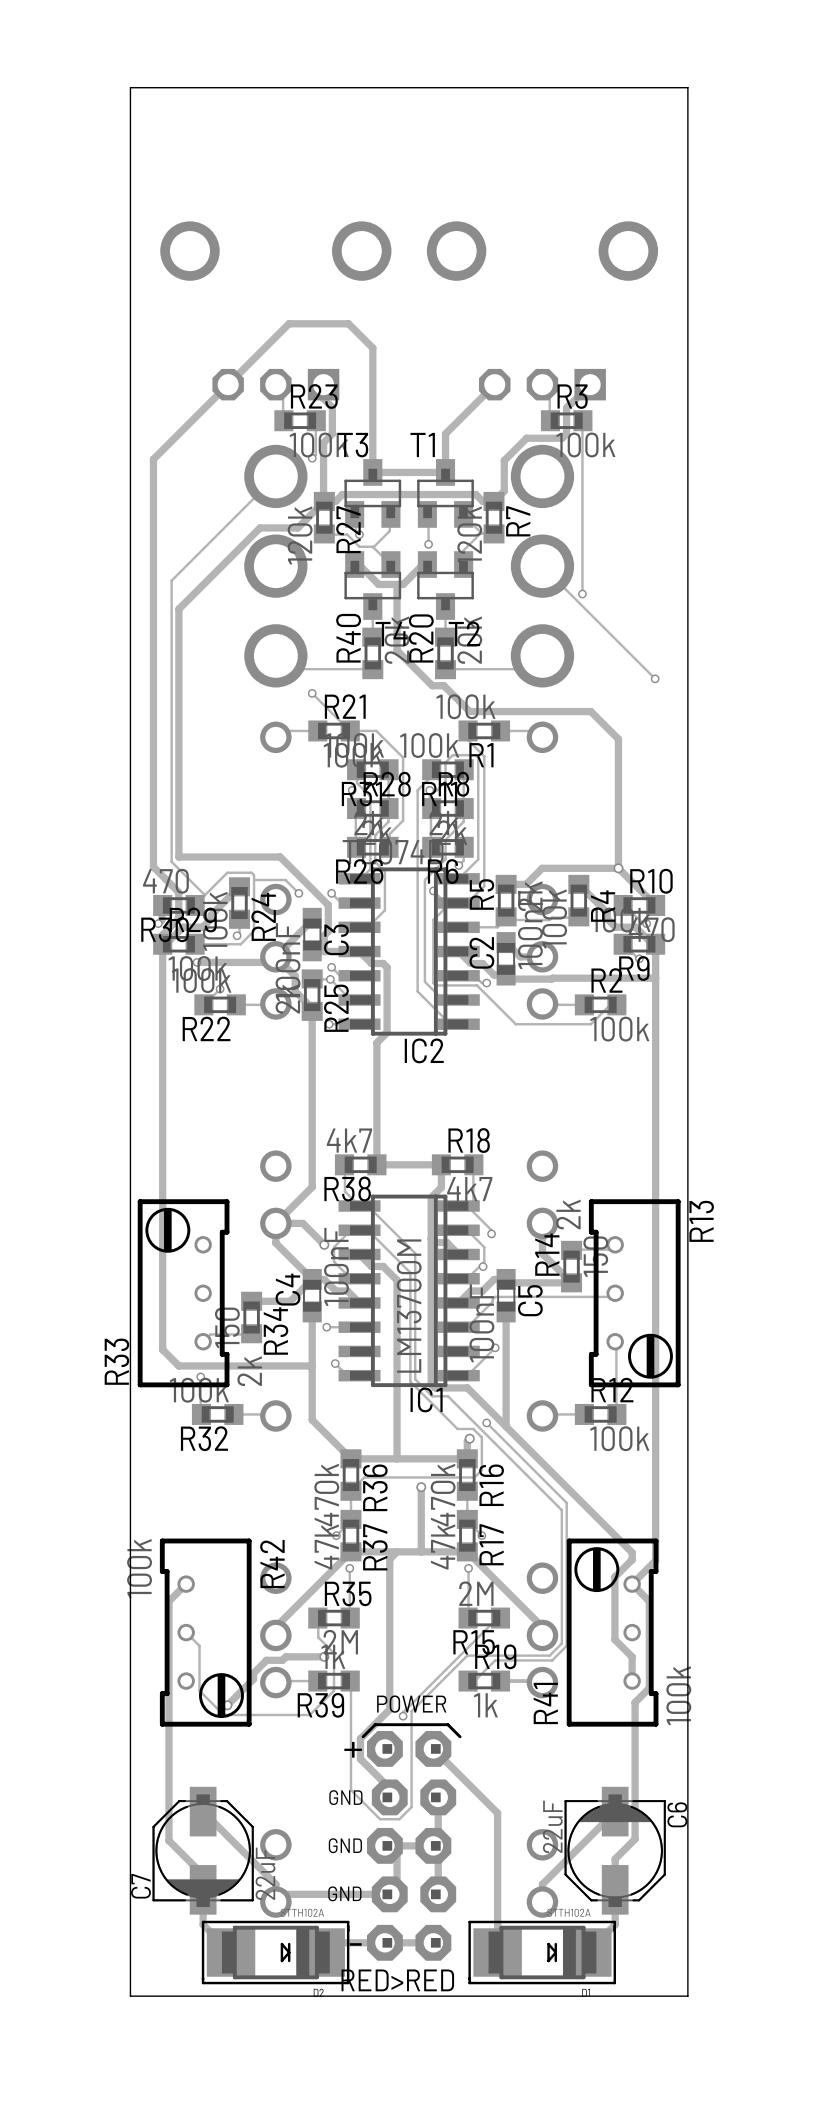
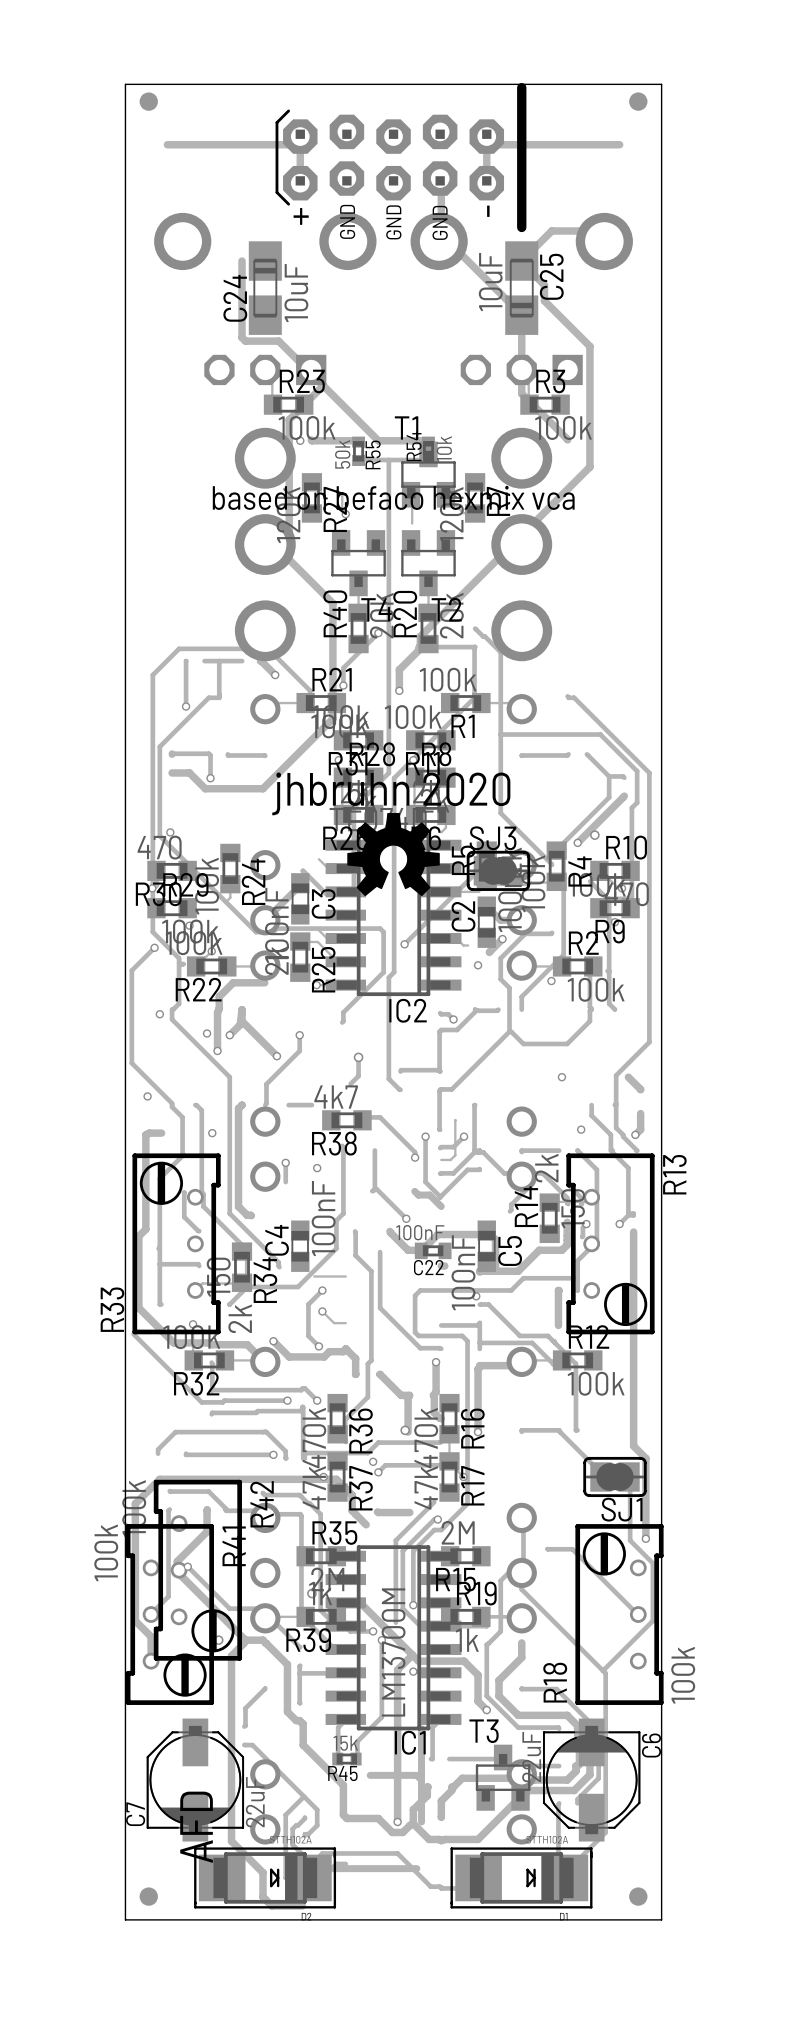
part: none -> (148, 101)
part: none -> (638, 101)
track: none -> (167, 144) (292, 144) (300, 136) (300, 183)
track: none -> (619, 144) (494, 144) (486, 136) (486, 183)
part: none -> (400, 157)
track: none -> (440, 178) (441, 234) (521, 315) (521, 393) (567, 439)
track: none -> (619, 230) (551, 230) (521, 261) (544, 285) (544, 300) (589, 346) (589, 467) (420, 636) (418, 650) (399, 669) (399, 690)
track: none -> (242, 261) (242, 337) (245, 341) (278, 341) (378, 440) (428, 442)
C24: none -> 10uF (265, 288)
C25: none -> 10uF (521, 288)
track: (323, 384) (323, 398) (332, 407) (332, 433) (323, 442) (324, 501) -> none
track: (494, 384) (445, 433) (445, 472) (372, 472) (372, 348) (348, 323) (289, 323) (153, 459) (153, 866) (178, 892) (178, 918) (162, 934) (162, 1349) (178, 1365) (312, 1365) -> none
track: (590, 384) (566, 407) (566, 433) (562, 438) (526, 438) (504, 460) (504, 491) (493, 501) (482, 501) (475, 494) (342, 494) (335, 501) (324, 501) -> none
track: none -> (323, 385) (289, 419) (289, 559) (332, 603) (332, 718) (262, 788) (205, 788) (189, 772) (172, 772)
track: (316, 420) (315, 454) (312, 458) -> none
track: (582, 420) (582, 594) -> none
track: none -> (311, 439) (358, 442)
R55: none -> 50k (358, 451)
R54: none -> 10k (428, 451)
track: (275, 476) (171, 580) (171, 861) (204, 895) -> none
track: none -> (388, 460) (388, 772) (353, 807) (353, 893) (325, 893) (302, 870)
track: none -> (428, 460) (358, 460)
T3 position: (372, 493) -> (503, 1777)
track: (324, 501) (297, 527) (260, 527) (178, 609) (178, 783) -> none
track: (390, 514) (389, 531) (373, 547) -> none
text: none -> based on befaco hexmix vca (393, 497)
track: (481, 532) (463, 550) (463, 564) -> none
track: (324, 533) (347, 534) (359, 546) (372, 546) (390, 564) -> none
via: (428, 544) -> none
track: (427, 564) (423, 564) (403, 584) (378, 584) (358, 564) (354, 564) -> none
track: (542, 566) (655, 678) -> none
track: (397, 584) (397, 650) (432, 685) (443, 685) (469, 711) (590, 711) (618, 739) (618, 868) -> none
via: (582, 594) -> none
track: none -> (475, 628) (500, 652) (500, 813) (552, 864)
track: (275, 655) (287, 669) (372, 669) -> none
track: (542, 655) (530, 669) (445, 669) -> none
track: none -> (378, 633) (343, 668) (343, 685)
via: none -> (378, 633)
track: none -> (437, 647) (475, 646) (475, 696) (394, 778) (394, 972) (388, 977) (388, 1078) (400, 1089)
via: (655, 678) -> none
track: none -> (186, 661) (186, 706)
track: none -> (219, 661) (219, 697) (208, 697) (159, 746) (159, 835) (255, 932) (273, 932) (276, 928) (380, 928) (383, 932) (383, 972) (343, 1012) (342, 1022)
track: none -> (242, 661) (204, 661)
track: none -> (260, 661) (275, 675)
track: (312, 693) (349, 730) (376, 730) (403, 757) (403, 820) (389, 833) (389, 847) -> none
via: (312, 693) -> none
via: none -> (275, 675)
via: none -> (343, 685)
via: none -> (399, 690)
track: none -> (311, 696) (310, 690) (268, 648) (179, 648) (152, 675) (152, 932) (179, 958) (179, 963) (183, 964) (179, 965) (179, 1003) (172, 1009) (172, 1019) (229, 1077) (229, 1213) (278, 1262) (279, 1267)
track: none -> (567, 696) (574, 697) (649, 772) (649, 1042) (616, 1075) (614, 1105) (616, 1127) (636, 1150)
track: (468, 730) (468, 740) (484, 756) (484, 886) (468, 901) (450, 903) (433, 920) (433, 983) (435, 985) (477, 985) (515, 1024) (590, 1024) (610, 1004) (616, 1004) -> none
via: none -> (186, 706)
track: none -> (500, 734) (600, 734) (637, 771) (637, 802) (631, 807) (631, 897) (630, 898) (607, 898) (590, 881)
track: (356, 769) (357, 783) (370, 796) (370, 869) (359, 878) -> none
track: (389, 769) (388, 821) (375, 835) (375, 861) (384, 871) (384, 910) (367, 927) (359, 927) -> none
track: (431, 769) (430, 777) (417, 790) (417, 991) (450, 1024) (458, 1024) -> none
track: (464, 769) (463, 821) (445, 840) (445, 859) (424, 880) (424, 981) (443, 1000) (458, 1000) -> none
track: (178, 784) (178, 857) (280, 857) (328, 905) (328, 931) (324, 935) (324, 951) -> (172, 754) (208, 753) (210, 755) (210, 778)
track: none -> (227, 754) (265, 755)
track: none -> (568, 754) (521, 755)
track: none -> (586, 754) (609, 776)
track: none -> (609, 776) (624, 777)
track: none -> (609, 776) (609, 797) (563, 842) (563, 954) (521, 996) (521, 1009)
track: (431, 808) (429, 807) (429, 790) (437, 790) (445, 781) (445, 762) (452, 755) (475, 755) (478, 757) (478, 859) (458, 878) -> none
via: none -> (210, 778)
text: none -> jhbruhn 2020 (391, 793)
track: none -> (624, 796) (577, 842)
drawing: none -> [347, 812, 440, 897]
via: none -> (170, 832)
via: (458, 865) -> none
track: (618, 868) (542, 868) (526, 884) (506, 884) -> none
track: (618, 868) (655, 905) -> none
via: none -> (577, 842)
track: (254, 880) (285, 880) (298, 893) -> none
track: (578, 884) (607, 912) (607, 918) (615, 927) (635, 927) (652, 944) (655, 944) (655, 1560) (632, 1584) (649, 1601) (649, 1688) (635, 1702) (635, 1839) (615, 1859) (615, 1924) (587, 1952) -> none
track: (239, 886) (211, 915) (211, 918) (202, 927) (182, 927) (162, 947) -> none
via: (298, 893) -> none
via: (331, 893) -> none
track: (195, 905) (227, 872) (251, 872) (254, 875) (254, 930) (240, 944) (195, 944) -> none
track: none -> (484, 870) (478, 870) (404, 944)
SJ3: none -> (498, 870)
track: none -> (609, 898) (609, 1003) (614, 1009)
via: (237, 935) -> none
track: (312, 950) (359, 951) (371, 963) (383, 963) (387, 967) (387, 1032) (376, 1042) (376, 1164) (441, 1164) (441, 1187) (431, 1197) (431, 1384) (435, 1387) (467, 1387) (632, 1552) (632, 1559) (614, 1576) (614, 1639) (632, 1656) (632, 1681) -> none
track: (458, 951) (470, 963) (482, 963) (494, 975) (506, 975) (510, 979) (655, 978) -> none
track: (197, 962) (269, 962) (275, 956) (295, 976) (295, 991) (312, 1008) (312, 1187) (275, 1223) -> none
via: (331, 967) -> none
track: none -> (552, 932) (525, 933) (500, 958) (500, 979) (509, 988) (509, 1031)
track: none -> (502, 939) (489, 952)
via: none -> (502, 939)
via: (330, 979) -> none
via: none -> (404, 944)
via: (486, 983) -> none
track: none -> (154, 947) (131, 970) (131, 1063) (172, 1103) (172, 1106) (182, 1117) (183, 1155) (159, 1178) (158, 1248) (159, 1304) (161, 1304)
via: none -> (154, 947)
via: none -> (478, 965)
track: none -> (589, 971) (589, 1007) (591, 1009) (589, 1021) (567, 1043) (523, 1043) (509, 1031)
via: none -> (551, 981)
track: none -> (264, 982) (233, 982) (219, 996) (217, 1050)
track: none -> (498, 1009) (475, 1009) (476, 1010) (457, 1029) (441, 1029) (439, 1031) (440, 1071) (400, 1071)
track: none -> (440, 1013) (448, 1014) (453, 1019)
via: none -> (159, 1014)
via: none -> (453, 1019)
track: none -> (509, 1031) (451, 1089) (440, 1089) (440, 1129)
via: none -> (207, 1033)
track: none -> (229, 1035) (240, 1024) (242, 1009) (242, 1021) (276, 1056)
via: none -> (229, 1035)
track: none -> (299, 1035) (299, 1050) (266, 1084) (265, 1105)
via: none -> (299, 1035)
via: none -> (217, 1050)
via: none -> (276, 1056)
track: none -> (358, 1057) (358, 1076) (350, 1084)
via: none -> (358, 1057)
via: none -> (561, 1077)
track: none -> (628, 1077) (640, 1089)
via: none -> (147, 1096)
R18 name position: R18 (469, 1140) -> R18 (555, 1682)
track: none -> (195, 1105) (201, 1110) (203, 1206) (247, 1250) (247, 1287)
track: none -> (311, 1105) (288, 1105)
track: none -> (475, 1105) (474, 1150) (479, 1150)
track: none -> (591, 1105) (591, 1115) (610, 1134) (610, 1150) (628, 1168) (628, 1213) (633, 1213) (633, 1215) (628, 1215) (619, 1224)
track: none -> (242, 1105) (238, 1108) (238, 1206) (247, 1215) (251, 1215)
R18 footprint: [431, 1154, 484, 1176] -> [575, 1524, 664, 1705]
track: none -> (640, 1113) (640, 1129) (635, 1134)
track: none -> (369, 1117) (380, 1117) (415, 1152) (415, 1157)
track: (344, 1164) (344, 1191) (359, 1206) (367, 1206) (415, 1253) (415, 1379) (432, 1396) (447, 1396) (561, 1510) (561, 1643) (549, 1655) (467, 1655) (411, 1711) (411, 1807) (399, 1819) (380, 1819) (350, 1790) (350, 1681) -> none
via: none -> (581, 1129)
track: none -> (161, 1133) (145, 1134) (145, 1229) (138, 1236) (138, 1307) (173, 1342) (247, 1344) (265, 1363)
via: none -> (212, 1133)
via: none -> (635, 1134)
track: none -> (425, 1136) (425, 1182) (440, 1197) (467, 1169) (479, 1169)
via: none -> (425, 1136)
track: none -> (464, 1136) (453, 1147) (440, 1148)
via: none -> (464, 1136)
R18 value: 4k7 (469, 1189) -> 100k (683, 1675)
track: none -> (342, 1145) (343, 1213) (336, 1220) (336, 1248) (297, 1287) (247, 1287)
track: none -> (374, 1150) (374, 1189) (372, 1191) (376, 1189) (406, 1218)
track: none -> (479, 1150) (504, 1173) (542, 1173) (567, 1197) (568, 1204)
track: none -> (479, 1150) (474, 1152) (453, 1173) (440, 1173)
track: none -> (559, 1150) (521, 1152)
track: none -> (577, 1150) (596, 1169) (596, 1241) (577, 1260) (577, 1290)
via: none -> (415, 1157)
track: (467, 1206) (491, 1230) (491, 1233) -> none
track: none -> (285, 1162) (285, 1182)
via: none -> (285, 1162)
via: none -> (317, 1168)
track: (275, 1223) (275, 1243) (312, 1279) -> none
track: (275, 1223) (302, 1223) (324, 1244) -> none
track: (542, 1223) (542, 1253) (571, 1282) (509, 1282) (506, 1279) (494, 1279) (482, 1290) (470, 1290) (458, 1302) -> none
track: (458, 1230) (467, 1230) (484, 1247) (484, 1261) (467, 1278) (458, 1278) -> none
track: none -> (530, 1185) (511, 1204) (510, 1211)
via: (491, 1233) -> none
track: none -> (570, 1187) (581, 1197) (582, 1204)
track: none -> (183, 1192) (184, 1217) (199, 1231)
via: (324, 1244) -> none
track: (359, 1254) (371, 1266) (383, 1266) (397, 1280) (397, 1458) -> none
via: (483, 1266) -> none
via: none -> (406, 1218)
track: none -> (567, 1222) (567, 1245) (561, 1250) (539, 1250) (518, 1271) (479, 1272)
track: none -> (586, 1224) (582, 1227) (582, 1237)
via: none -> (586, 1224)
via: none -> (619, 1224)
track: (359, 1278) (350, 1278) (334, 1261) (334, 1247) (350, 1230) (367, 1230) (410, 1272) (410, 1381) (457, 1428) (473, 1428) (481, 1437) (481, 1470) (474, 1477) (364, 1477) (350, 1490) (350, 1521) (336, 1535) -> none
track: (312, 1279) (324, 1279) (335, 1290) (347, 1290) (359, 1302) -> none
track: (312, 1279) (290, 1301) (251, 1301) -> none
track: none -> (355, 1231) (355, 1255) (371, 1271) (371, 1360) (367, 1363) (367, 1397) (345, 1419) (345, 1442)
track: none -> (389, 1231) (408, 1250) (421, 1250) (437, 1234) (490, 1234) (495, 1239) (495, 1271)
track: none -> (633, 1232) (633, 1446) (645, 1458) (645, 1538)
IC1 position: (409, 1290) -> (393, 1637)
track: (615, 1293) (611, 1296) (495, 1296) (467, 1327) (458, 1327) -> none
C22: none -> 100nF (433, 1250)
track: none -> (380, 1252) (380, 1307) (420, 1348) (441, 1348)
track: (312, 1311) (312, 1420) (350, 1458) (467, 1458) (467, 1441) (469, 1438) -> none
track: (506, 1311) (506, 1426) -> none
track: none -> (159, 1264) (198, 1264) (199, 1265)
track: none -> (444, 1266) (441, 1266)
via position: (326, 1327) -> (322, 1290)
track: none -> (577, 1278) (523, 1278) (511, 1290) (420, 1290) (415, 1295) (415, 1332) (418, 1335) (462, 1335) (467, 1341) (467, 1503) (441, 1530) (434, 1530) (413, 1551) (413, 1605)
track: none -> (247, 1287) (229, 1304)
track: none -> (322, 1290) (308, 1304) (308, 1335) (318, 1346)
track: none -> (559, 1290) (558, 1325)
track: (615, 1341) (616, 1414) -> none
track: (495, 1347) (467, 1375) (458, 1375) -> none
track: none -> (479, 1304) (488, 1304) (520, 1335) (547, 1335) (575, 1363) (575, 1430) (577, 1430)
track: none -> (441, 1325) (478, 1325) (479, 1322) (479, 1348)
track: none -> (133, 1334) (201, 1402) (287, 1400)
track: none -> (273, 1341) (289, 1356) (324, 1356) (329, 1351) (343, 1351) (345, 1348) (355, 1358) (355, 1374)
via: none -> (273, 1341)
track: none -> (479, 1342) (532, 1342) (554, 1365)
via: none -> (318, 1346)
track: none -> (211, 1362) (211, 1390) (301, 1390) (304, 1388) (317, 1400)
track: none -> (436, 1362) (434, 1412) (441, 1418)
via: none -> (436, 1362)
track: none -> (521, 1363) (520, 1365) (479, 1365) (478, 1369) (478, 1432)
track: (486, 1422) (566, 1502) (566, 1645) (552, 1660) (495, 1660) (474, 1681) (468, 1681) -> none
via: (486, 1422) -> none
track: none -> (380, 1374) (401, 1395) (409, 1395) (408, 1432)
via: (469, 1438) -> none
via: none -> (287, 1400)
via: none -> (317, 1400)
track: none -> (211, 1414) (255, 1412) (257, 1411) (301, 1411) (302, 1406) (303, 1458) (304, 1458) (304, 1453) (367, 1453) (378, 1442) (441, 1442)
track: (421, 1487) (421, 1551) -> none
via: none -> (478, 1432)
track: none -> (521, 1431) (559, 1430) (600, 1472) (601, 1476)
track: none -> (158, 1453) (158, 1449) (175, 1432) (265, 1431) (285, 1451) (286, 1458)
track: none -> (186, 1453) (273, 1454)
via: none -> (273, 1454)
via: none -> (373, 1461)
track: none -> (441, 1465) (385, 1465) (378, 1472)
via: none -> (378, 1472)
SJ1: none -> (614, 1476)
track: none -> (628, 1476) (630, 1540) (652, 1563) (652, 1620) (603, 1670)
track: none -> (169, 1491) (208, 1491) (226, 1510) (255, 1510) (262, 1516) (264, 1514) (300, 1514) (301, 1615) (334, 1648) (345, 1649)
track: (397, 1551) (389, 1559) (389, 1709) (360, 1738) (360, 1759) (389, 1788) (389, 1797) -> none
track: none -> (262, 1493) (264, 1495) (299, 1495) (320, 1514) (320, 1610) (336, 1626) (345, 1626) (350, 1631) (373, 1631)
track: none -> (434, 1502) (395, 1540) (395, 1622)
track: (349, 1568) (350, 1618) -> none
via: (349, 1568) -> none
track: (468, 1568) (468, 1618) -> none
via position: (468, 1568) -> (437, 1519)
track: none -> (169, 1509) (168, 1596) (151, 1614)
track: none -> (207, 1509) (207, 1531) (177, 1561) (177, 1571) (245, 1640)
track: none -> (377, 1511) (409, 1512)
track: none -> (437, 1519) (434, 1519) (402, 1551) (402, 1608) (420, 1626) (486, 1626)
track: (186, 1584) (168, 1601) (168, 1840) (203, 1874) (203, 1924) (231, 1952) -> none
track: none -> (366, 1524) (352, 1510) (352, 1495) (336, 1479) (159, 1479) (135, 1503) (135, 1620) (151, 1636) (151, 1661)
track: none -> (523, 1530) (523, 1559) (500, 1580) (500, 1631) (486, 1644) (486, 1696) (518, 1727) (559, 1728)
via: none -> (645, 1538)
track: none -> (547, 1549) (572, 1549) (638, 1614)
track: (317, 1618) (318, 1637) (334, 1653) (334, 1690) (309, 1714) (223, 1714) (199, 1690) (199, 1645) (186, 1632) -> none
track: (500, 1618) (497, 1618) (403, 1712) (403, 1716) -> none
track: none -> (187, 1566) (229, 1608) (261, 1608) (300, 1647)
via: none -> (187, 1566)
R41 rotation: 0° (612, 1632) -> 180° (169, 1614)
R41 position: (612, 1632) -> (169, 1614)
track: (542, 1635) (542, 1626) (467, 1551) (350, 1551) (275, 1626) (275, 1635) -> none
track: none -> (521, 1587) (605, 1673) (605, 1832) (577, 1860) (577, 1877)
track: (324, 1656) (286, 1656) (282, 1660) (266, 1660) (253, 1673) (253, 1679) (227, 1705) -> none
track: none -> (345, 1602) (360, 1603) (418, 1661) (464, 1661) (478, 1675) (478, 1701) (486, 1710)
via: none -> (413, 1605)
via: none -> (373, 1631)
track: none -> (245, 1640) (262, 1640) (287, 1664) (287, 1711) (296, 1720) (299, 1720) (303, 1724) (303, 1745) (343, 1785) (343, 1815) (346, 1818) (378, 1818) (392, 1832) (402, 1832) (413, 1823)
track: none -> (245, 1640) (231, 1655) (231, 1841) (262, 1872) (262, 1897) (271, 1905) (302, 1905)
track: none -> (381, 1640) (381, 1717) (357, 1741) (356, 1759)
via: none -> (381, 1640)
track: none -> (521, 1642) (521, 1657) (499, 1680) (499, 1696) (518, 1715) (567, 1715) (577, 1725) (577, 1734) (589, 1746) (589, 1774) (574, 1790) (528, 1790) (478, 1839) (429, 1839) (413, 1823)
via: (403, 1716) -> none
track: none -> (412, 1655) (397, 1669) (397, 1821)
track: none -> (300, 1665) (300, 1703)
via: none -> (413, 1671)
track: none -> (345, 1672) (299, 1673)
track: (433, 1748) (497, 1813) (497, 1952) -> none
track: none -> (265, 1688) (245, 1708) (244, 1726)
track: none -> (521, 1688) (556, 1689) (598, 1731) (598, 1778) (577, 1799) (577, 1803)
via: none -> (486, 1710)
track: none -> (345, 1719) (338, 1727) (337, 1759)
track: none -> (441, 1719) (432, 1727) (432, 1759) (430, 1759)
track: (203, 1811) (275, 1884) (275, 1902) (283, 1894) (389, 1894) (397, 1887) (397, 1845) -> none
track: (615, 1811) (542, 1884) (542, 1902) -> none
track: none -> (244, 1744) (252, 1745) (317, 1809) (317, 1825) (304, 1835)
track: none -> (579, 1752) (579, 1764) (575, 1766) (575, 1771) (567, 1780) (462, 1778) (452, 1787) (451, 1790) (441, 1801) (441, 1817)
R45: none -> 15k (346, 1759)
track: none -> (449, 1759) (502, 1759) (503, 1757) (511, 1766) (559, 1766)
part: (411, 1842) -> none
track: none -> (428, 1787) (427, 1795) (413, 1809) (413, 1823)
track: none -> (304, 1796) (285, 1815) (285, 1877) (296, 1888) (313, 1888) (336, 1863) (345, 1863)
track: none -> (559, 1803) (559, 1877)
track: none -> (304, 1817) (292, 1828) (292, 1844) (304, 1856) (304, 1859)
via: none -> (397, 1821)
text: none -> AFD (196, 1827)
track: none -> (304, 1877) (320, 1863) (322, 1853) (397, 1853) (430, 1886) (484, 1889)
part: none -> (148, 1896)
part: none -> (638, 1896)

